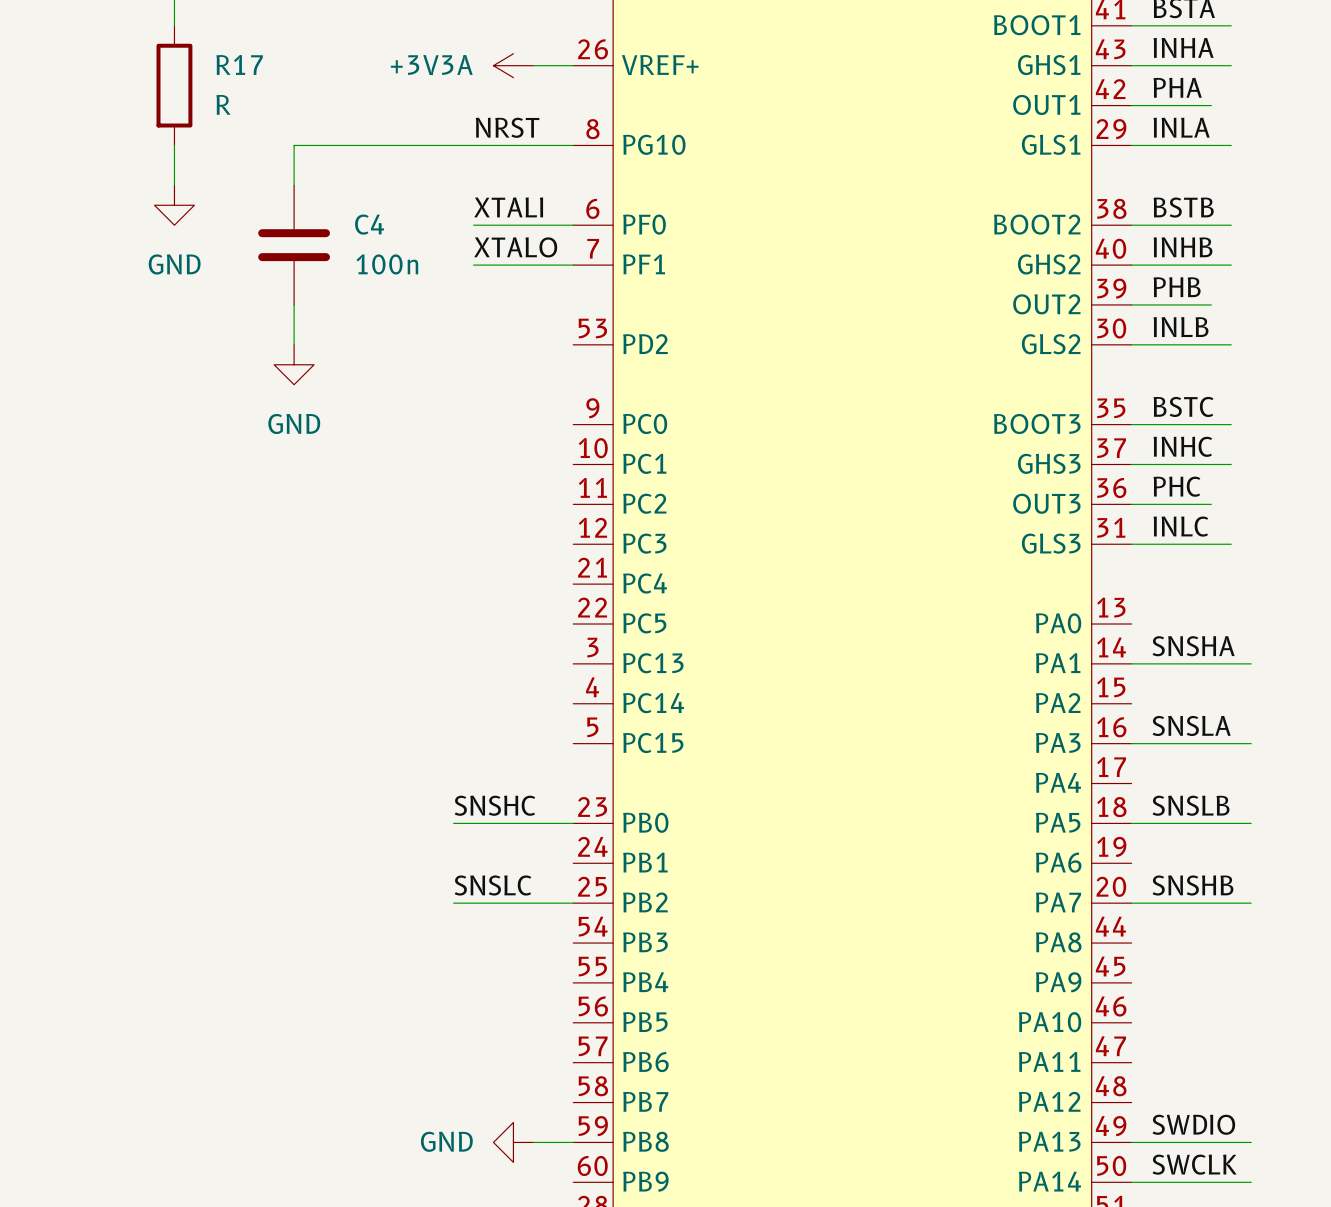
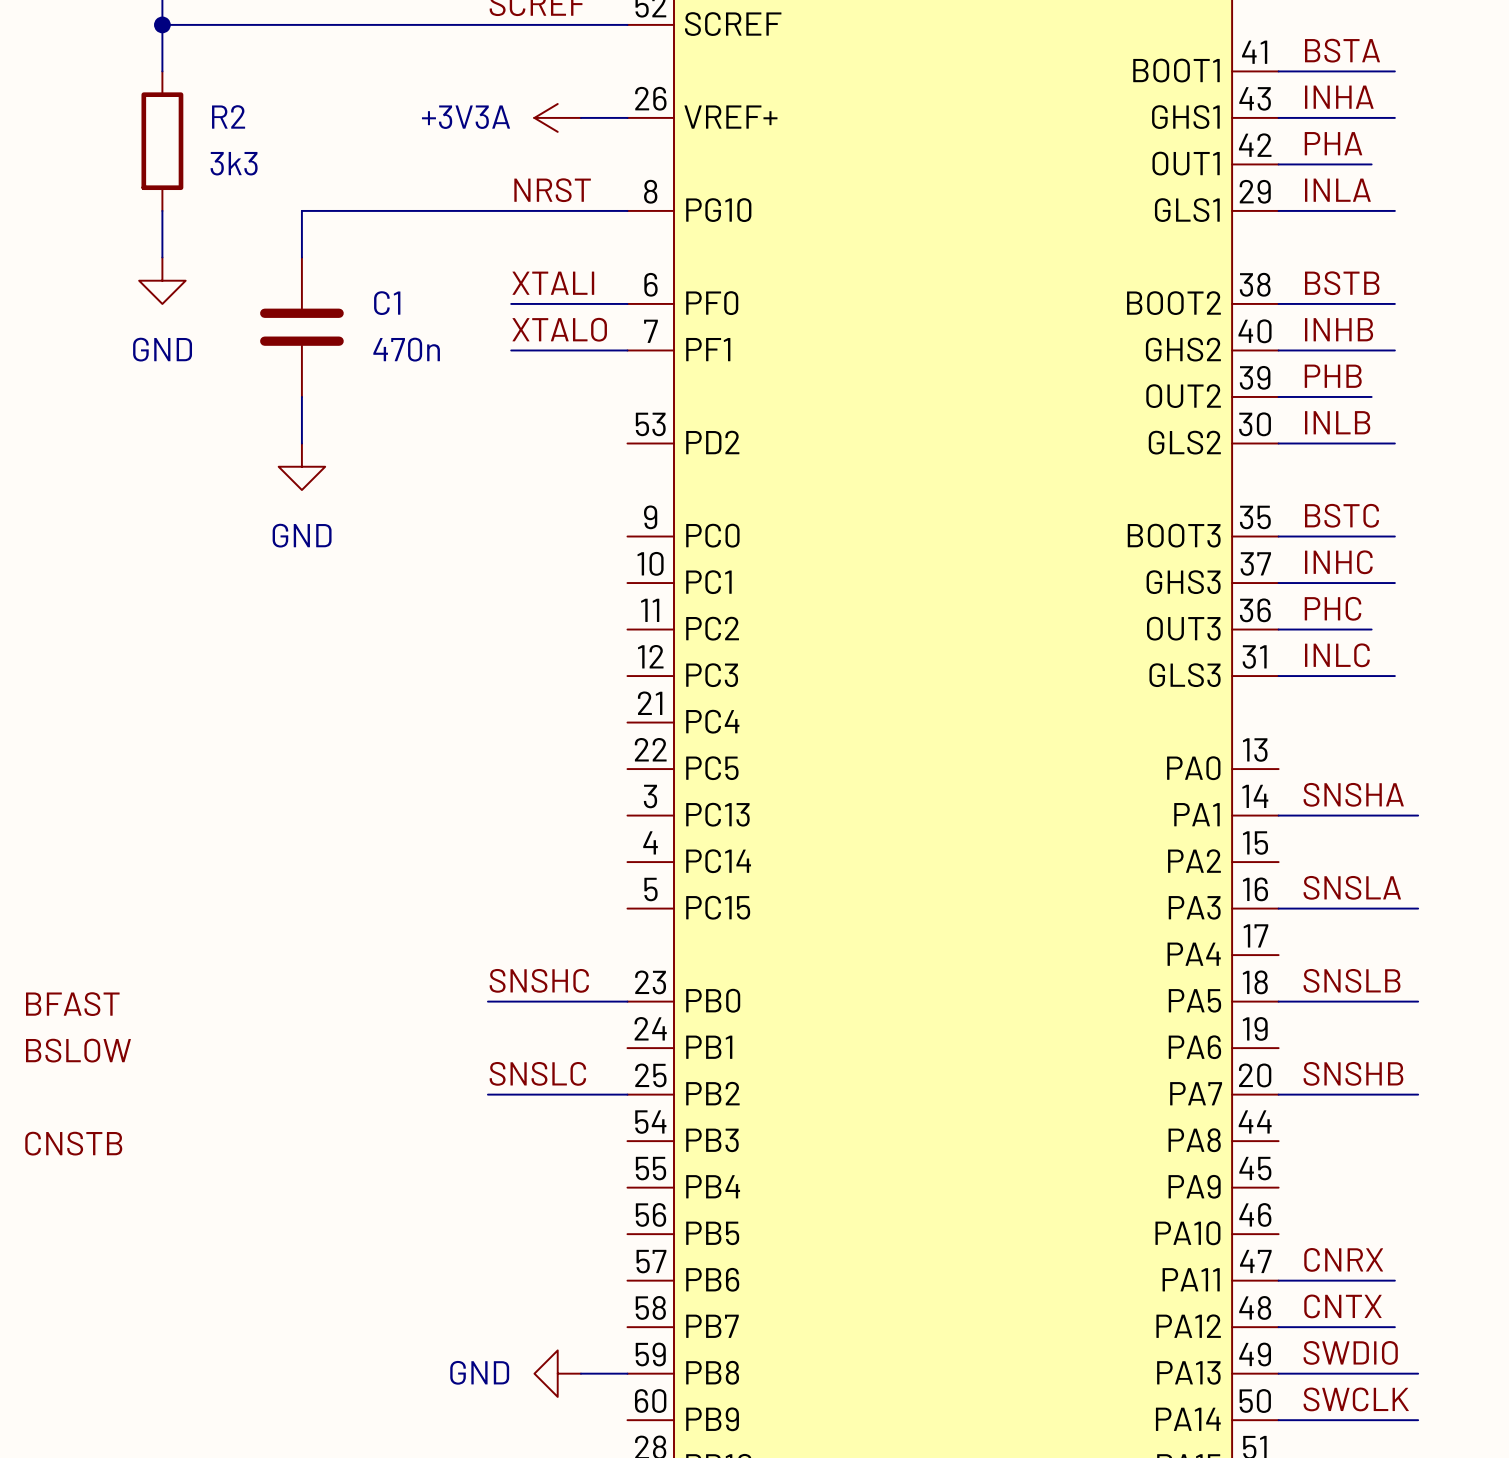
R17 name: R17 (239, 64) -> R2 (228, 116)
R17 value: R (223, 104) -> 3k3 (234, 163)
C4 name: C4 (369, 224) -> C1 (387, 303)
C4 value: 100n (387, 264) -> 470n (406, 349)
label: none -> BFAST (72, 1004)
label: none -> BSLOW (78, 1050)
label: none -> CNSTB (73, 1143)
label: none -> CNRX (1343, 1259)
wire: none -> (1278, 1280) (1394, 1280)
label: none -> CNTX (1342, 1306)
wire: none -> (1278, 1327) (1394, 1327)

